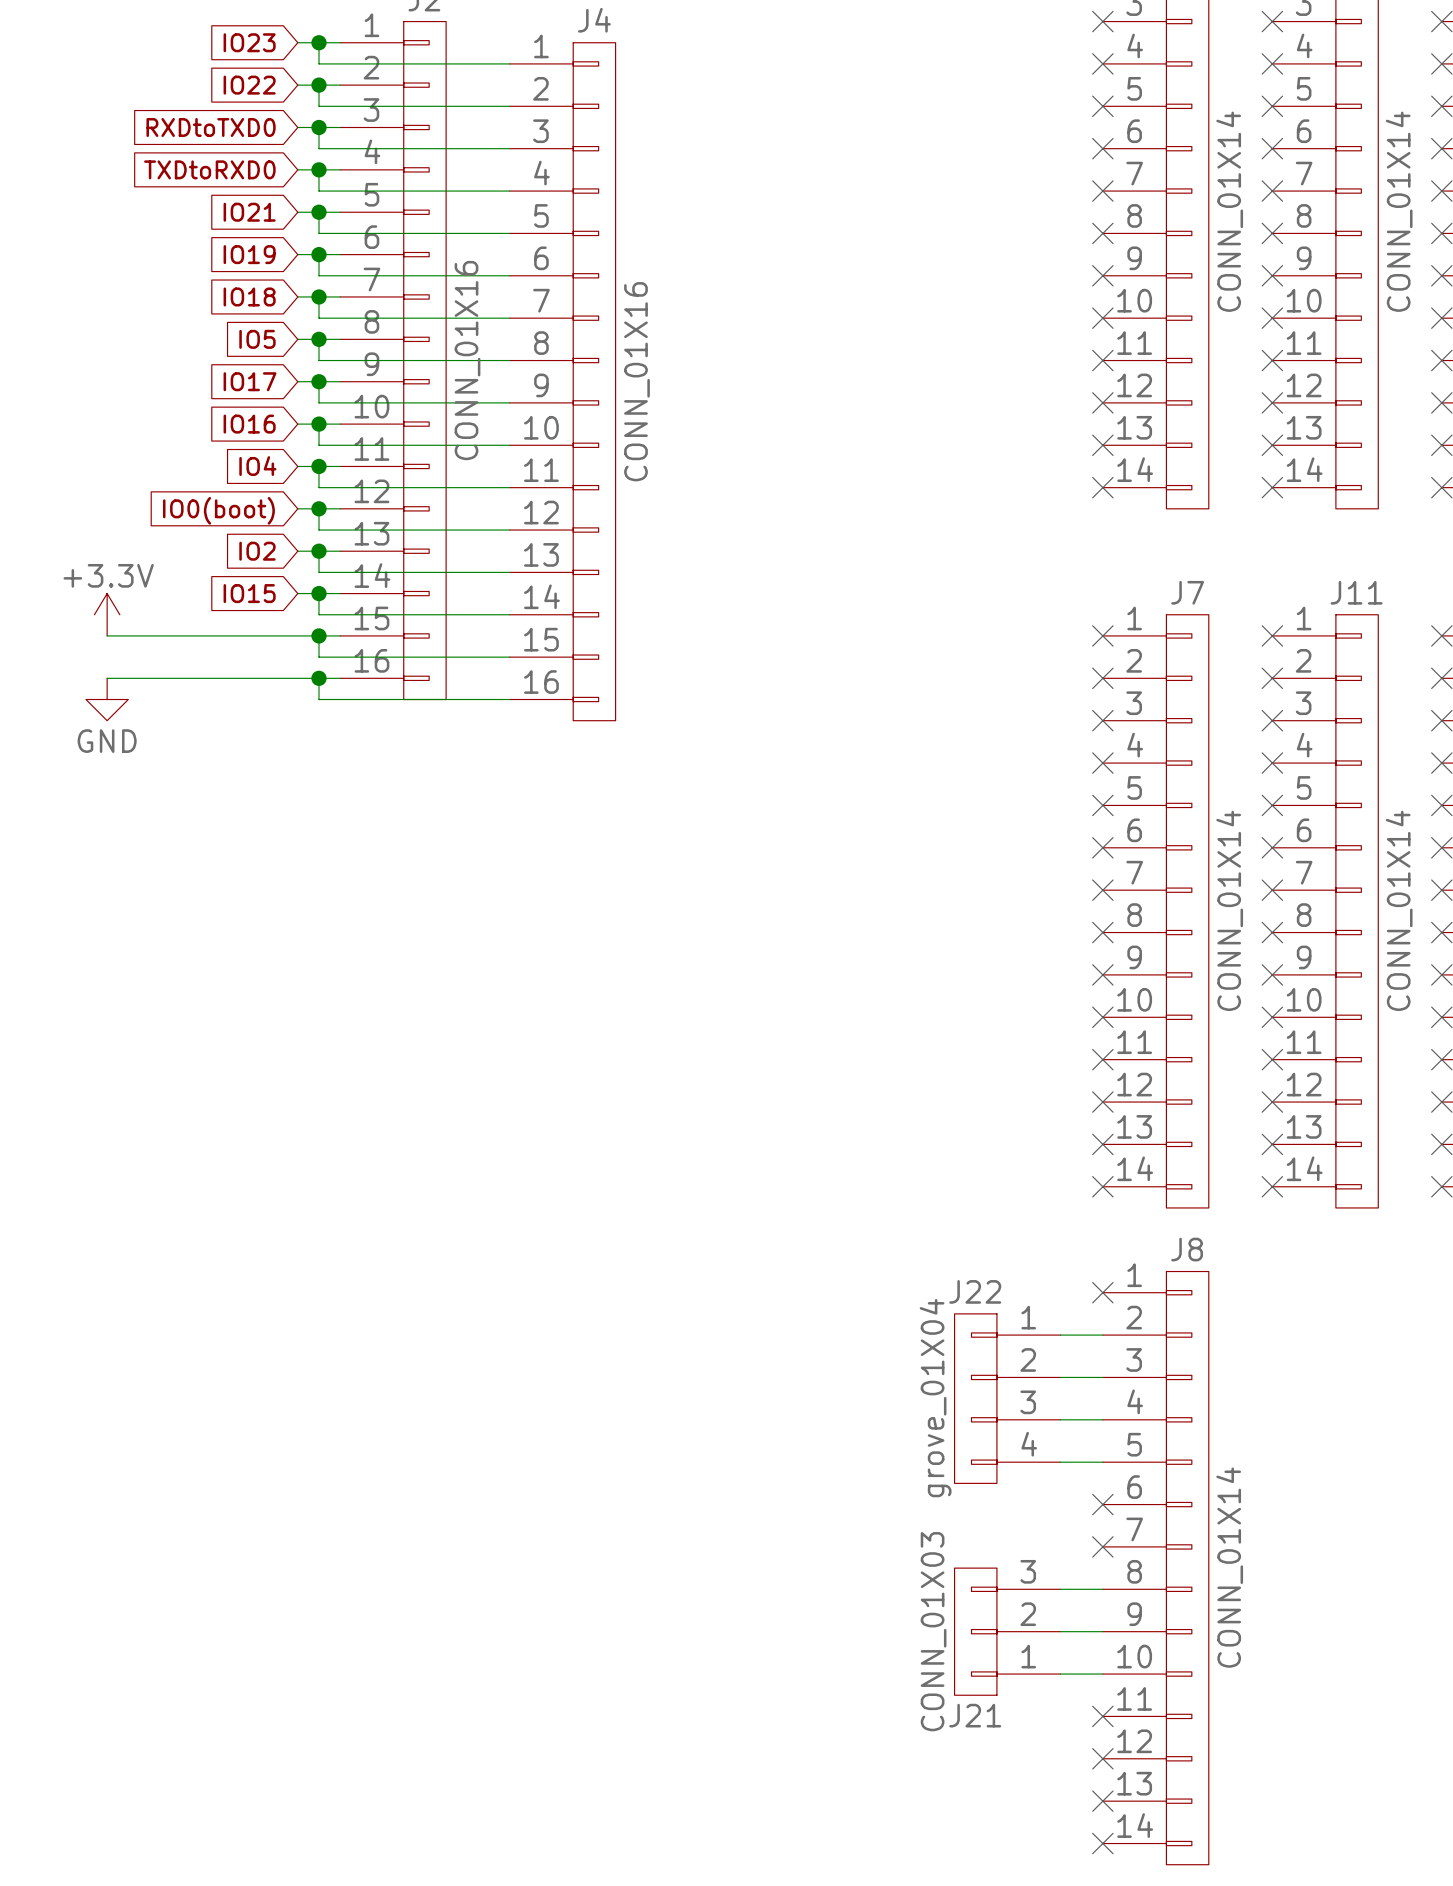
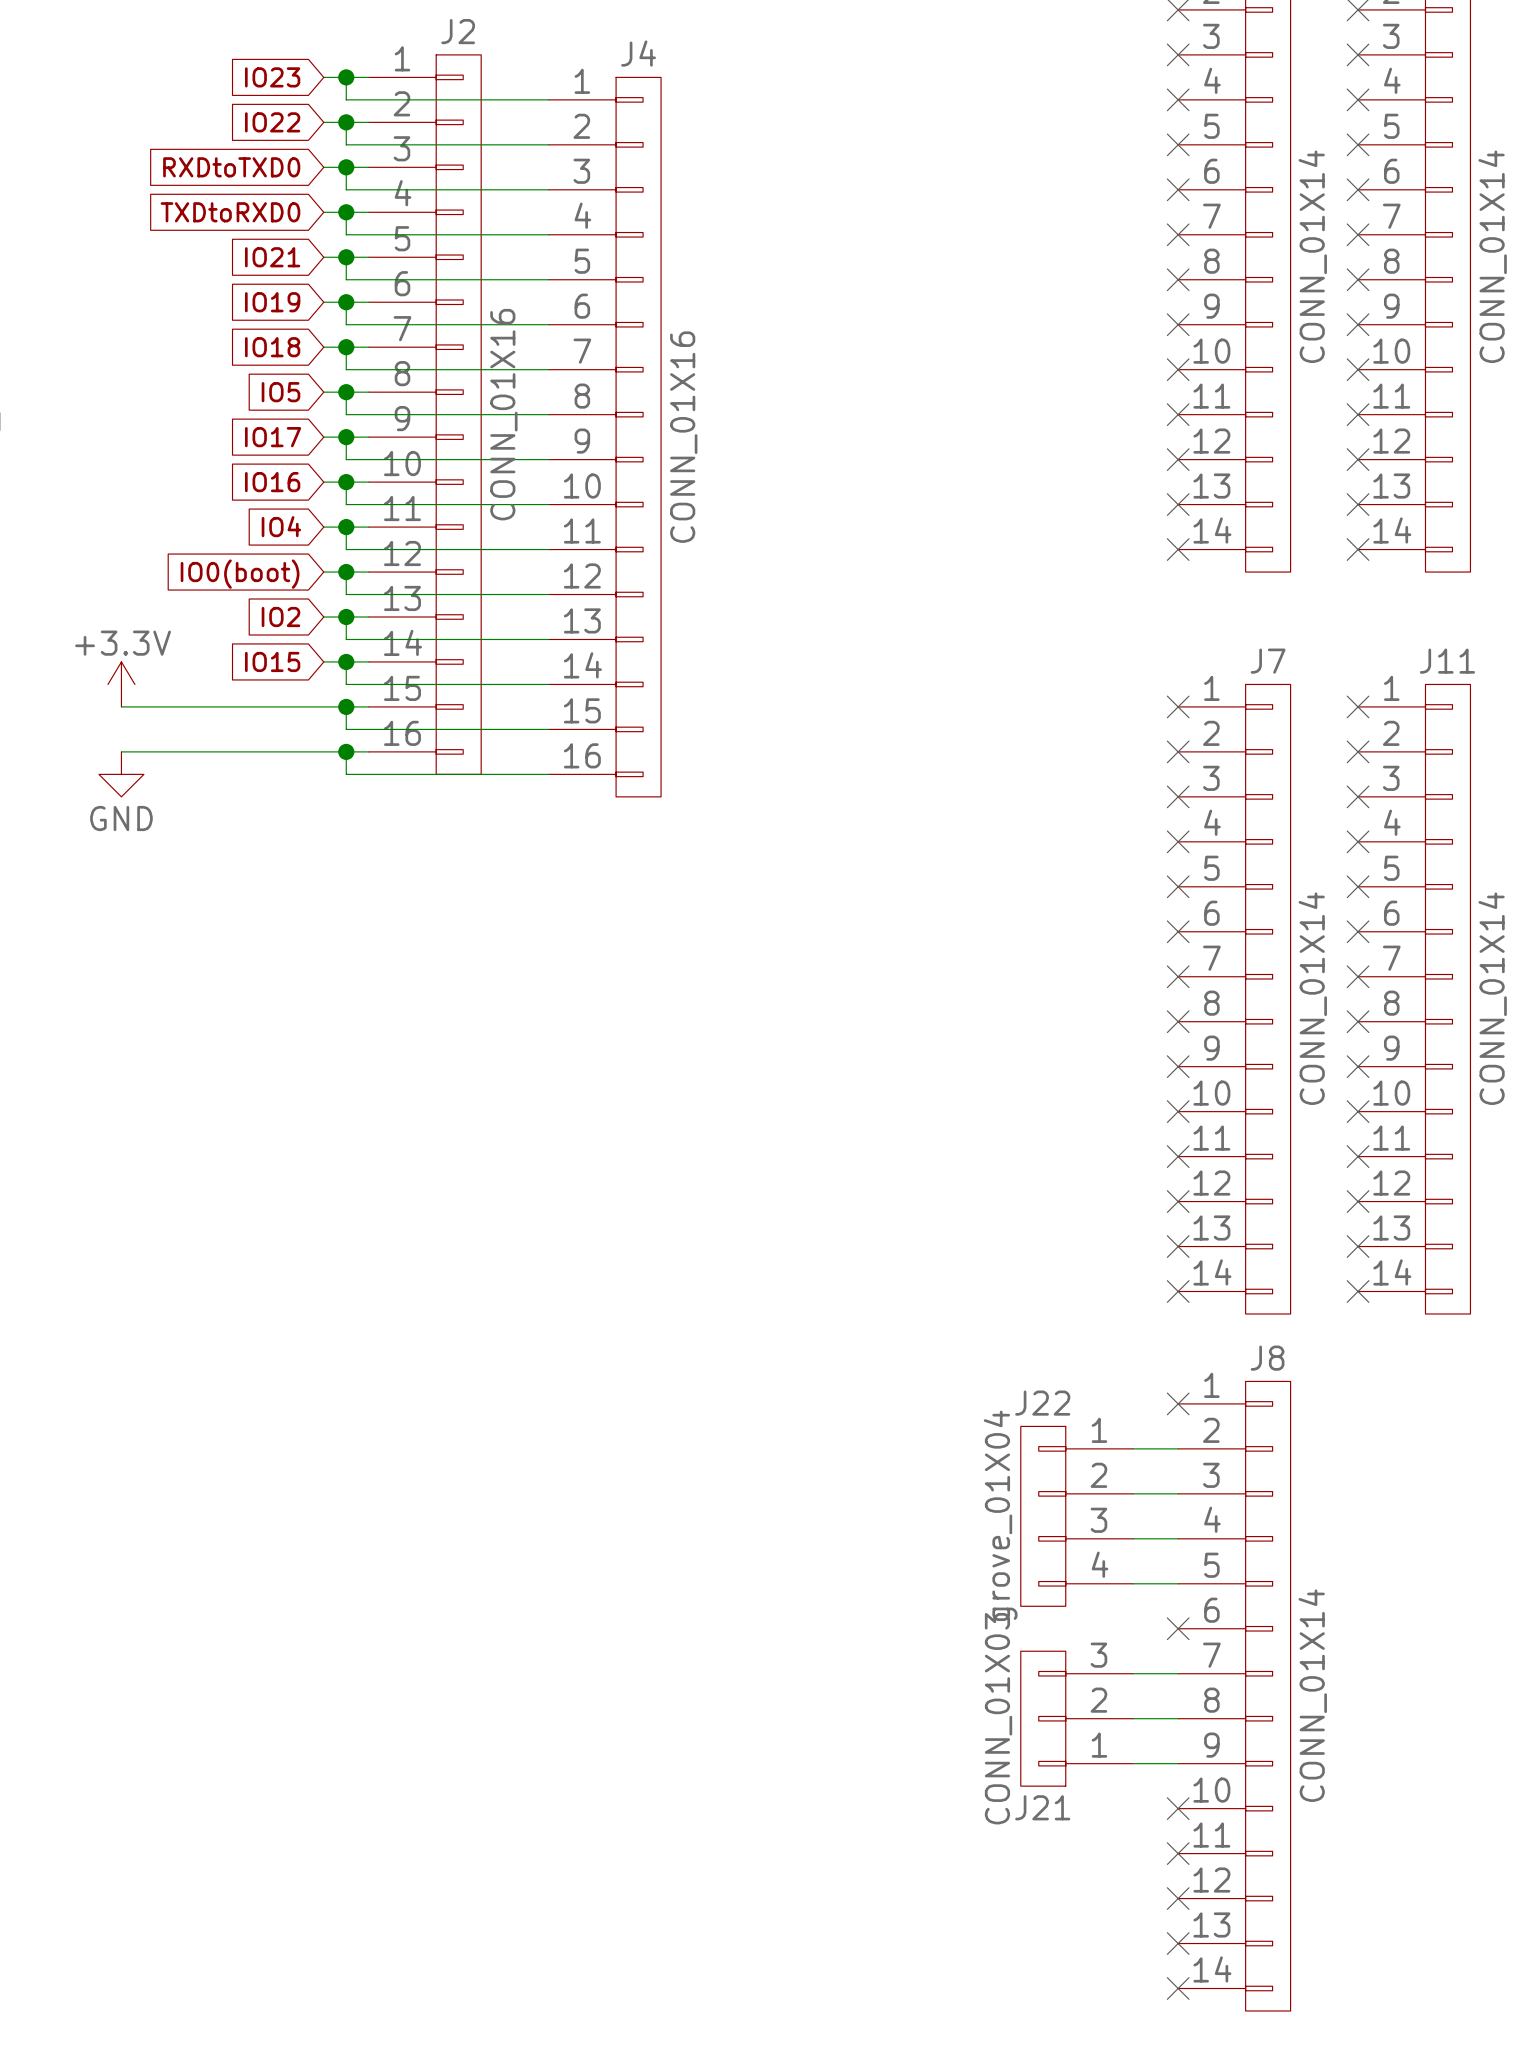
no-connect mark: (1102, 1546) -> none
J21 position: (1007, 1631) -> (1076, 1718)
wire: (1060, 1674) (1102, 1674) -> (1133, 1673) (1178, 1673)
no-connect mark: none -> (1178, 1808)

